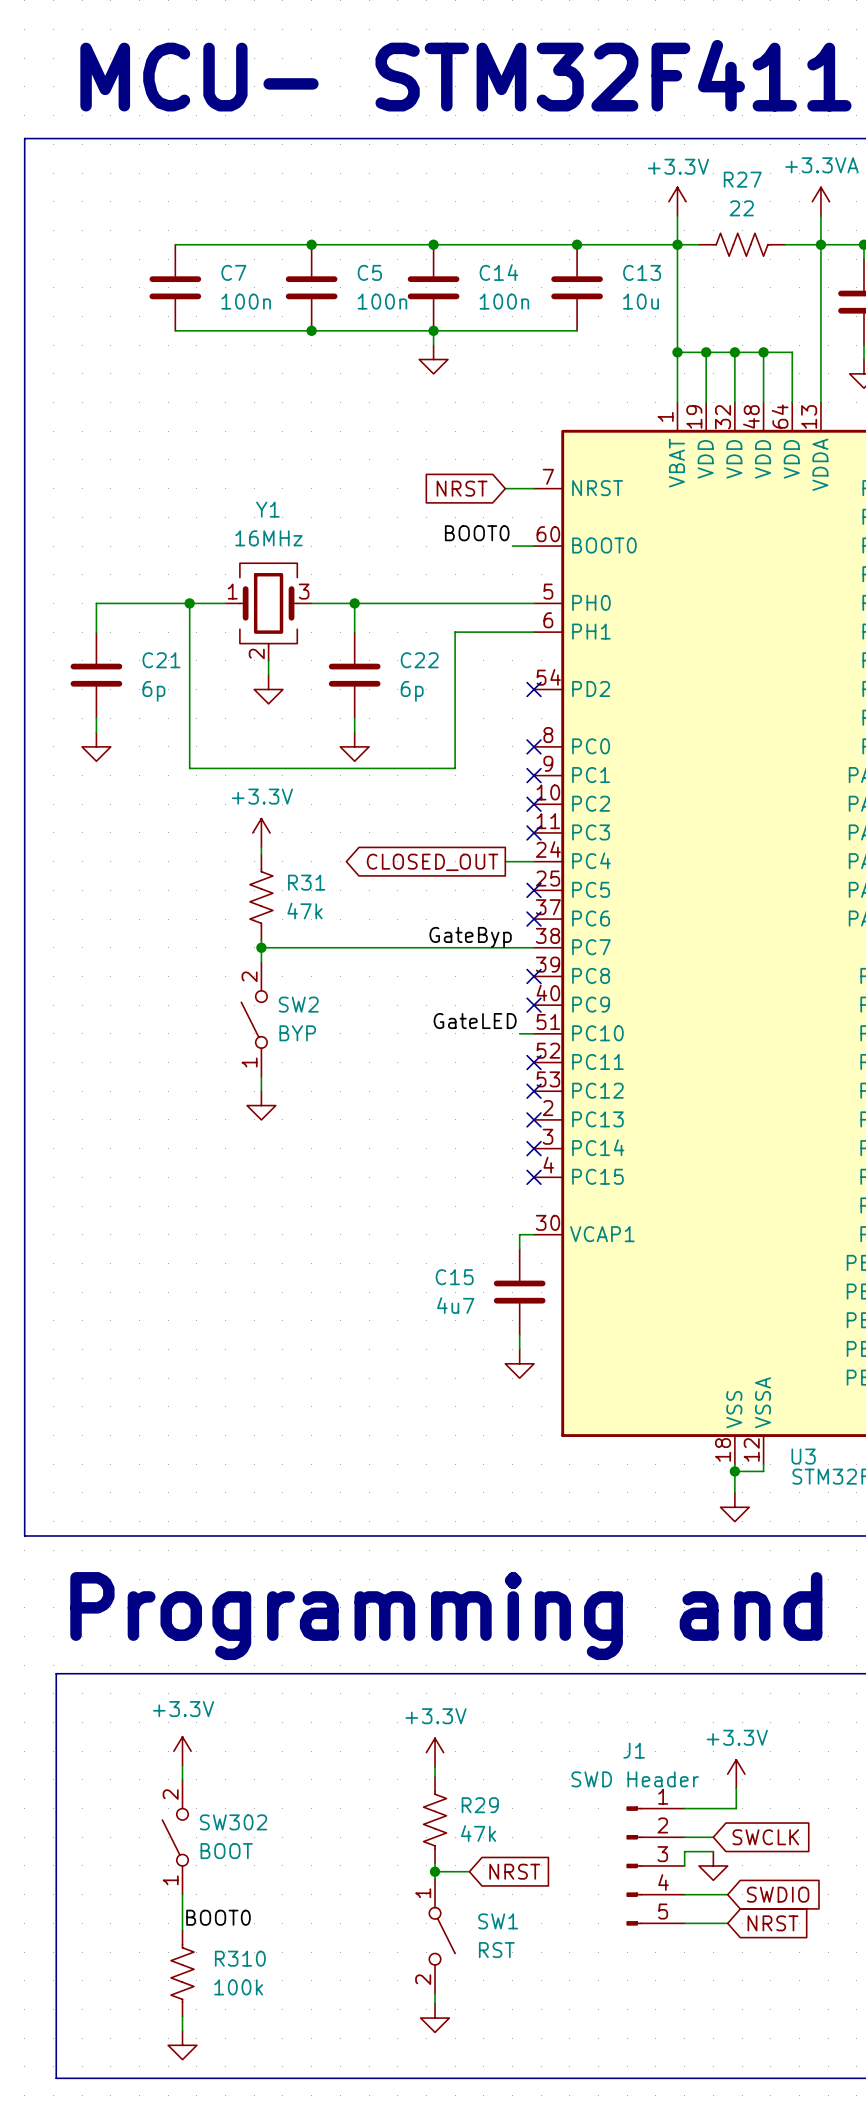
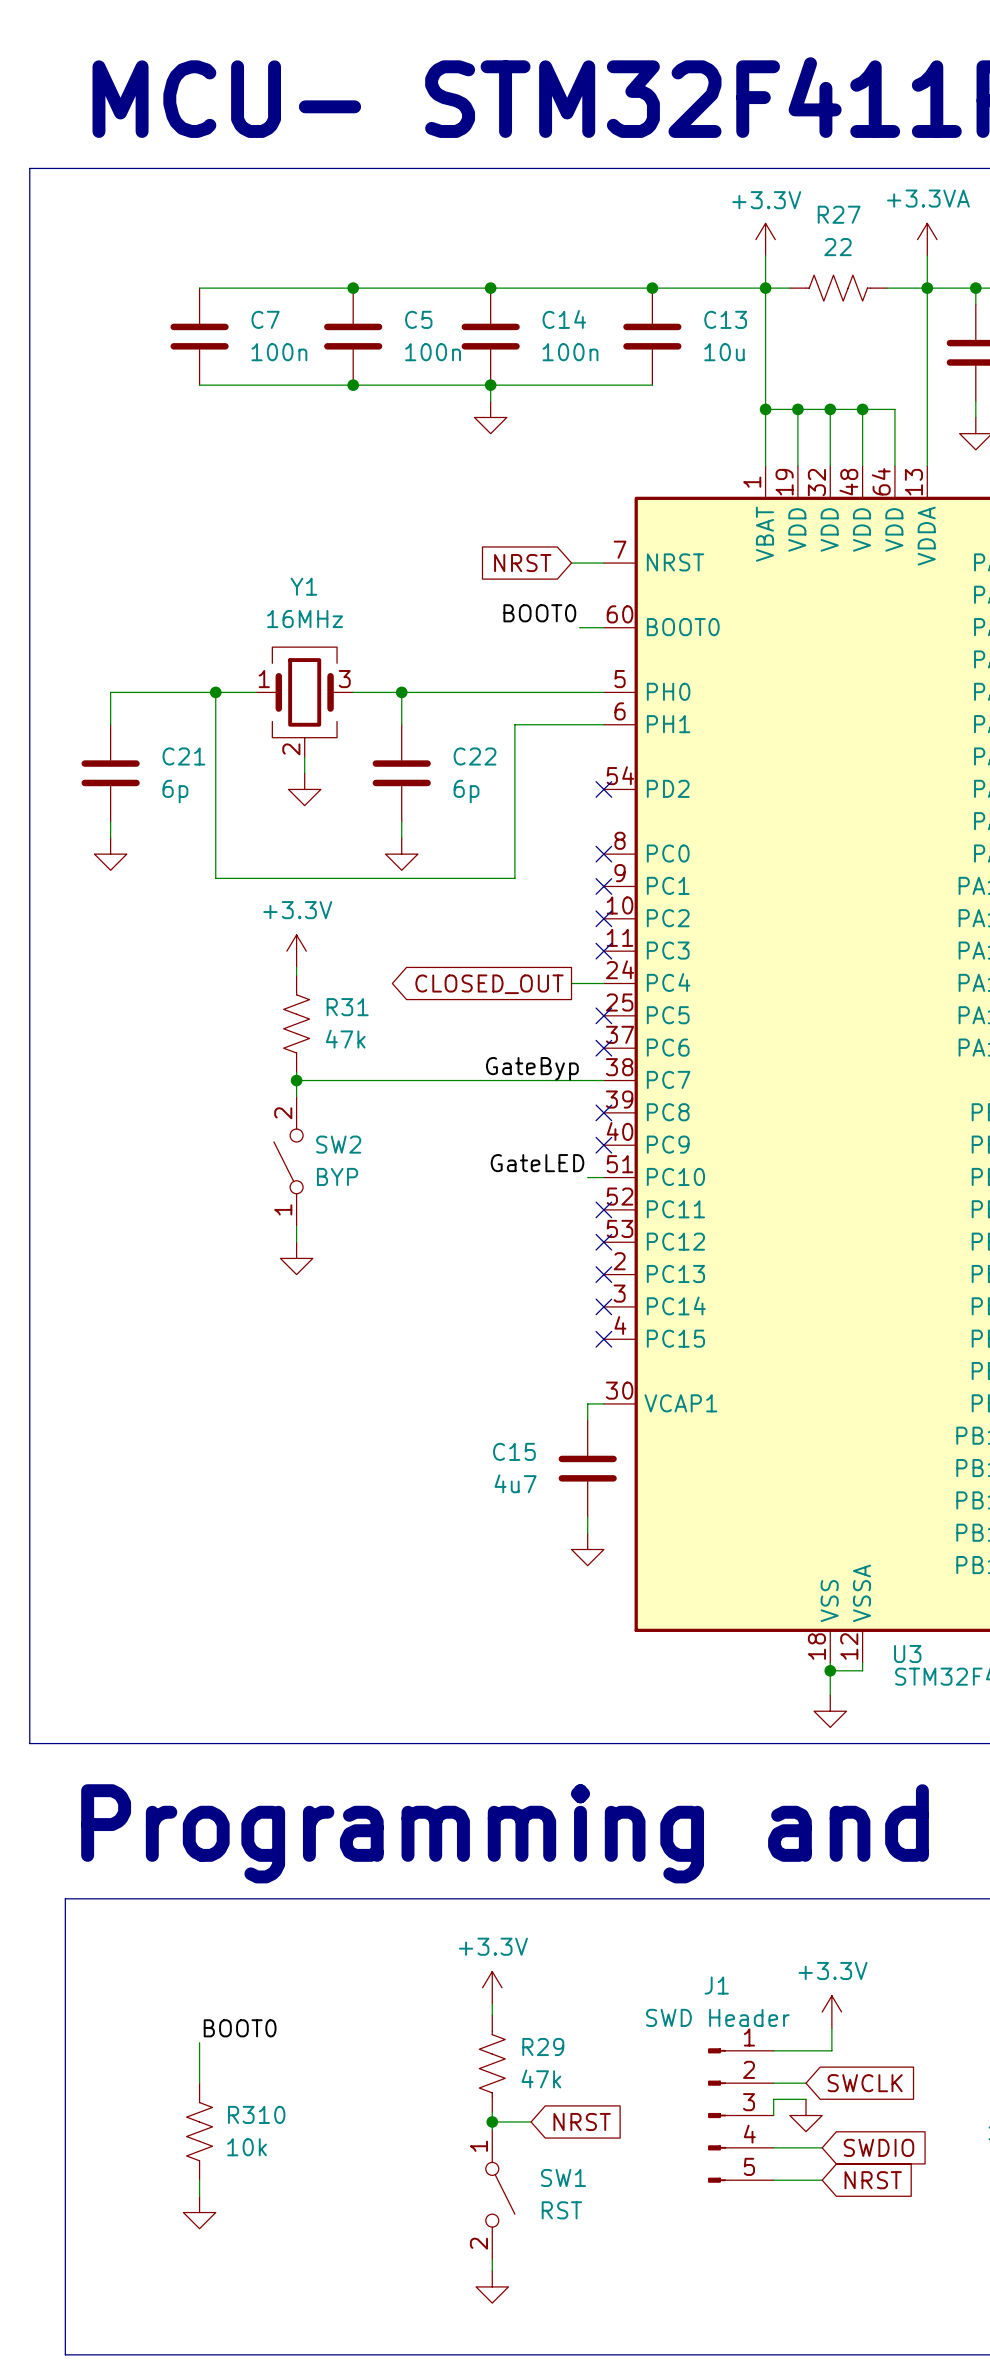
power symbol: +3.3V (182, 1751) -> none
wire: (182, 1765) (182, 1779) -> none
SW302: BOOT (175, 1837) -> none
wire: (182, 1894) (182, 1930) -> (199, 2042) (199, 2083)
label position: BOOT0 (218, 1917) -> BOOT0 (240, 2028)
R310 name position: R310 (240, 1958) -> R310 (256, 2114)
R310 position: (182, 1973) -> (199, 2131)
R310 value: 100k (238, 1987) -> 10k (247, 2147)
wire: (182, 2016) (182, 2030) -> (199, 2180) (199, 2196)
power symbol position: (182, 2045) -> (199, 2212)

